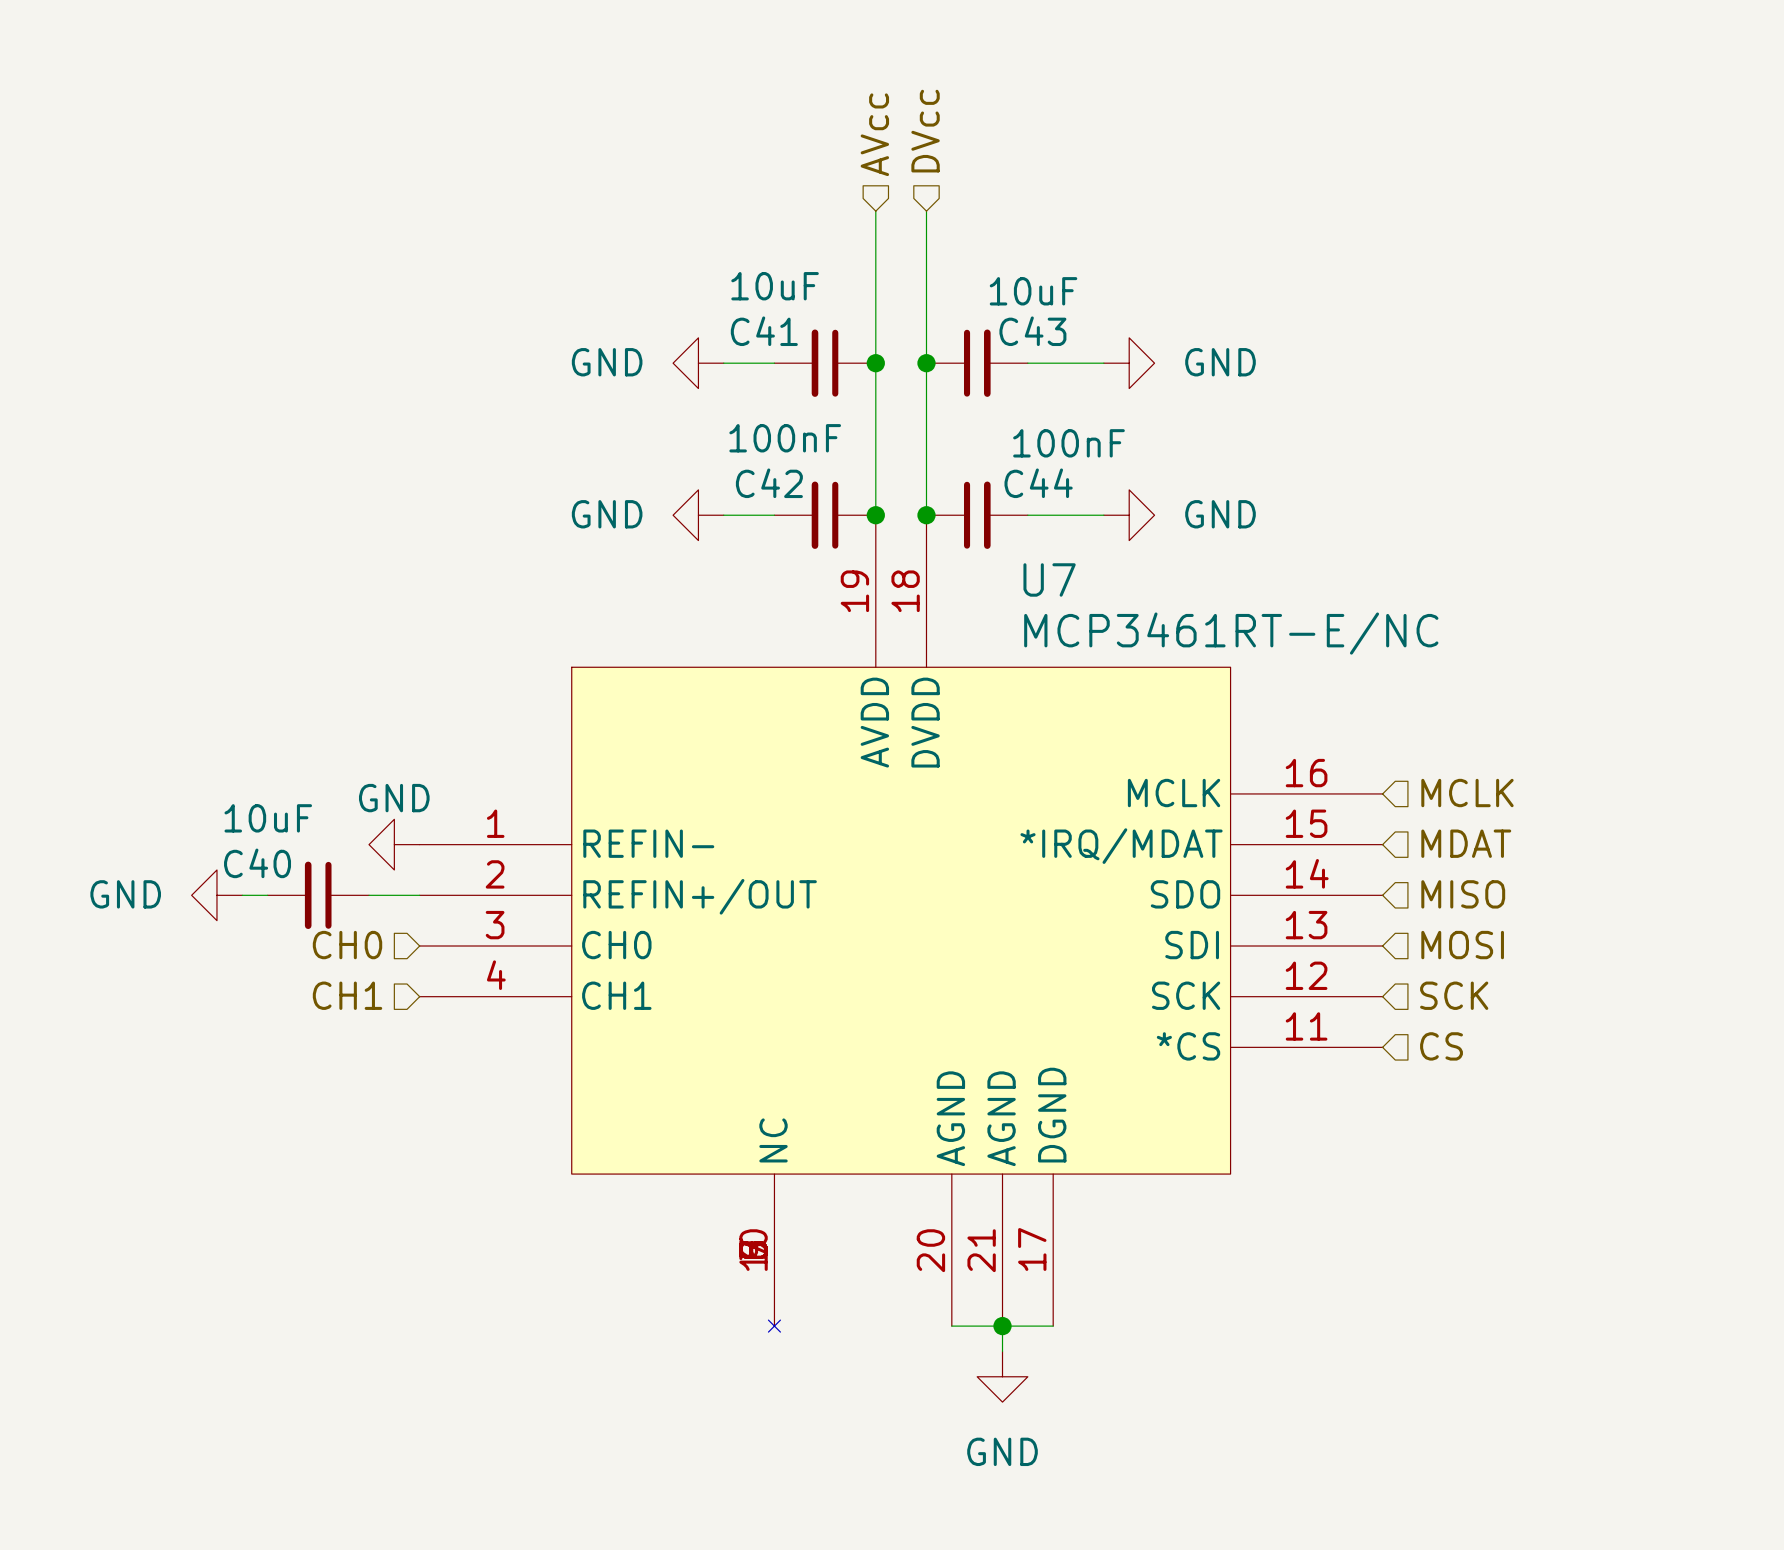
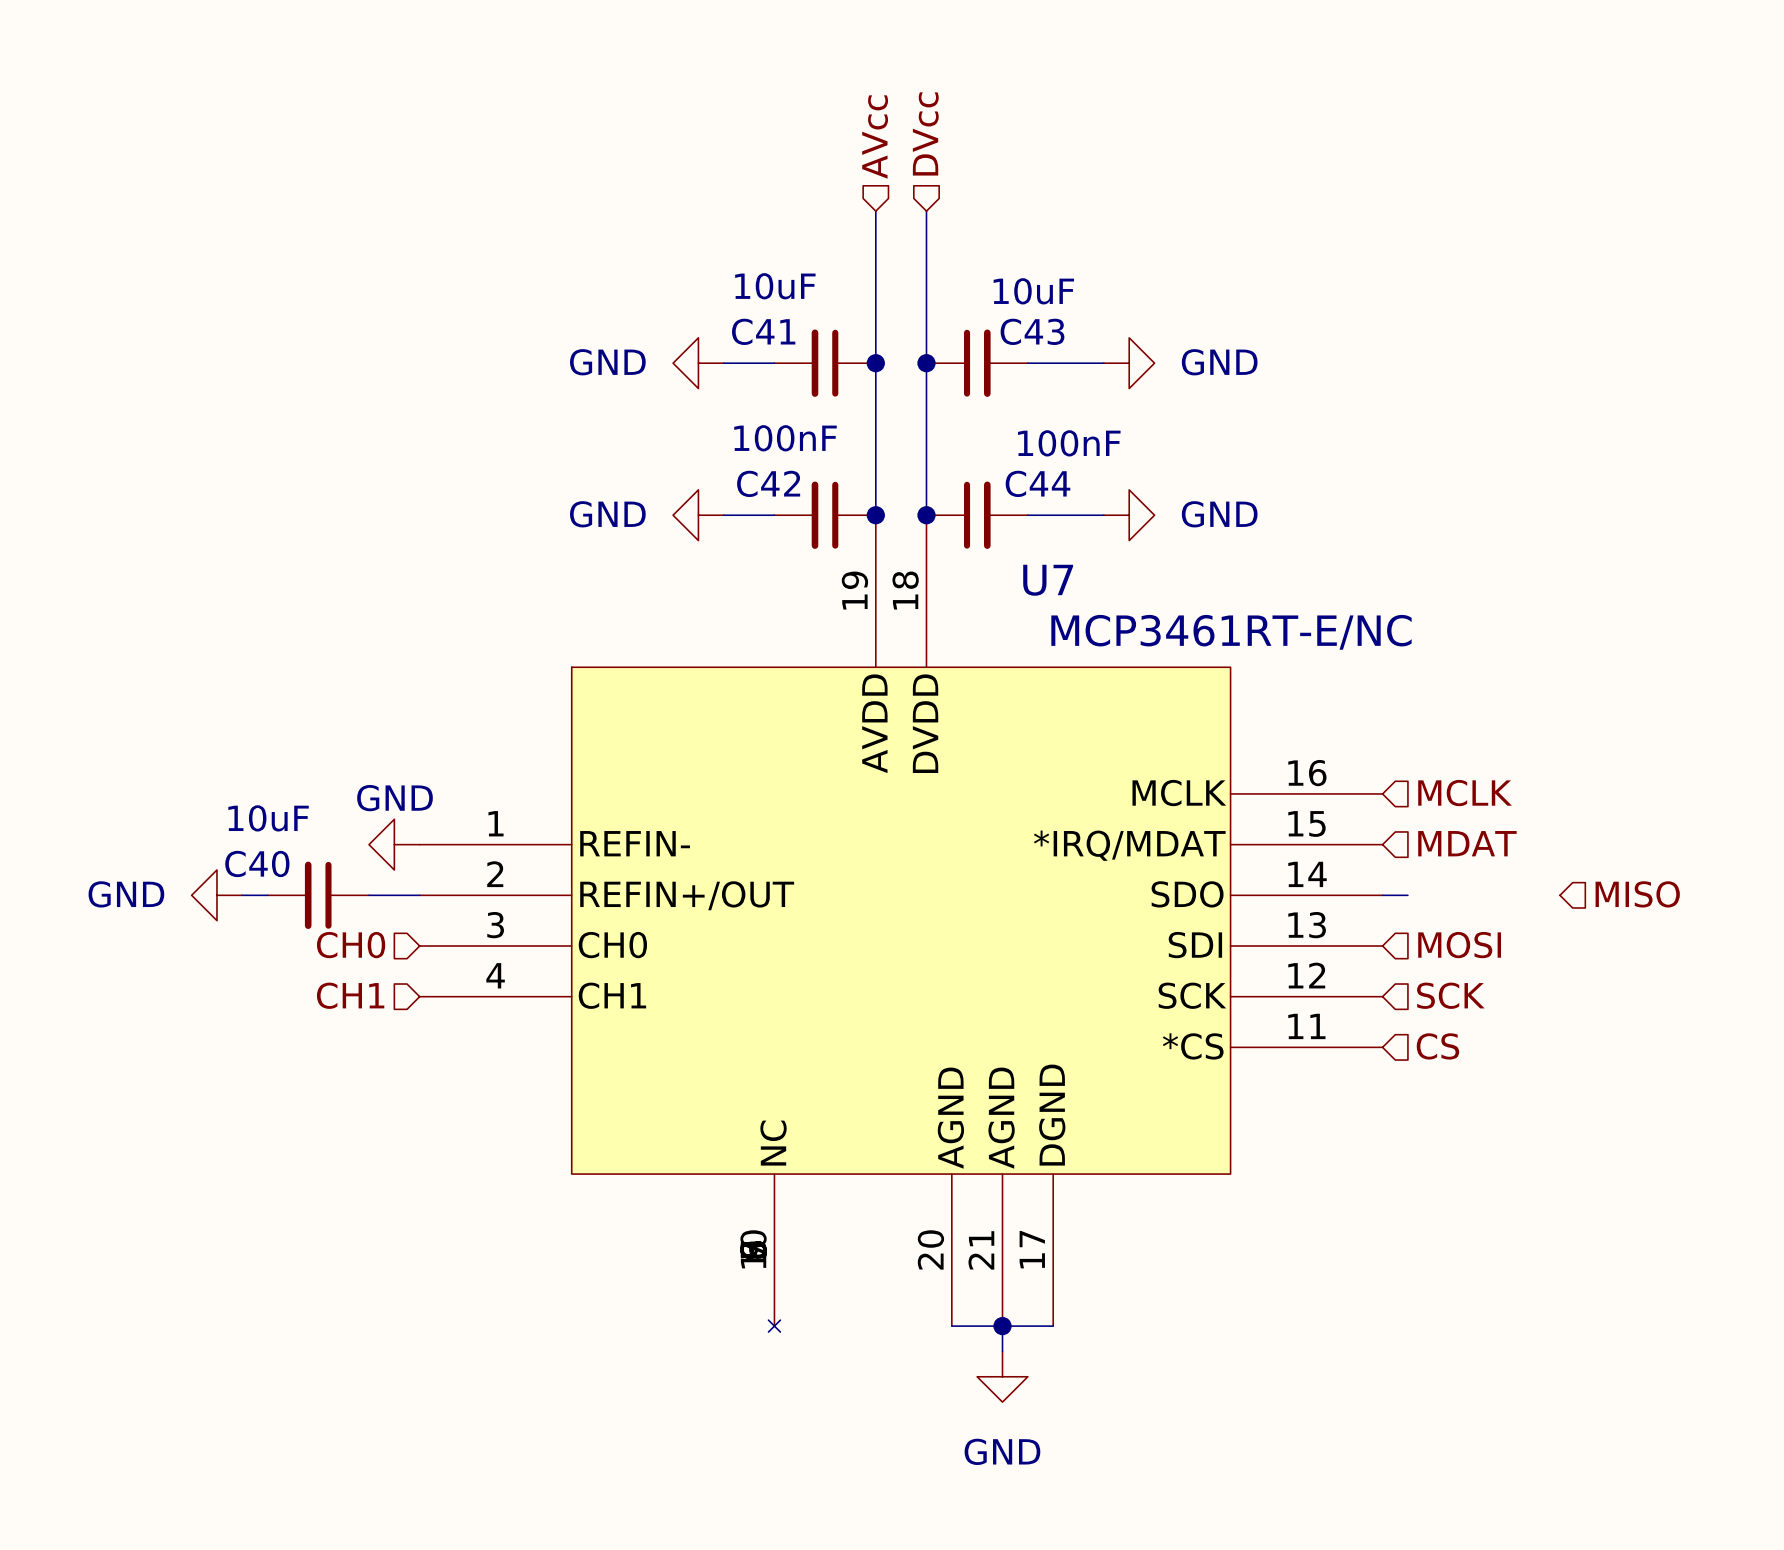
hierarchical label position: MISO (1463, 894) -> MISO (1637, 894)
wire: none -> (1382, 895) (1407, 895)

